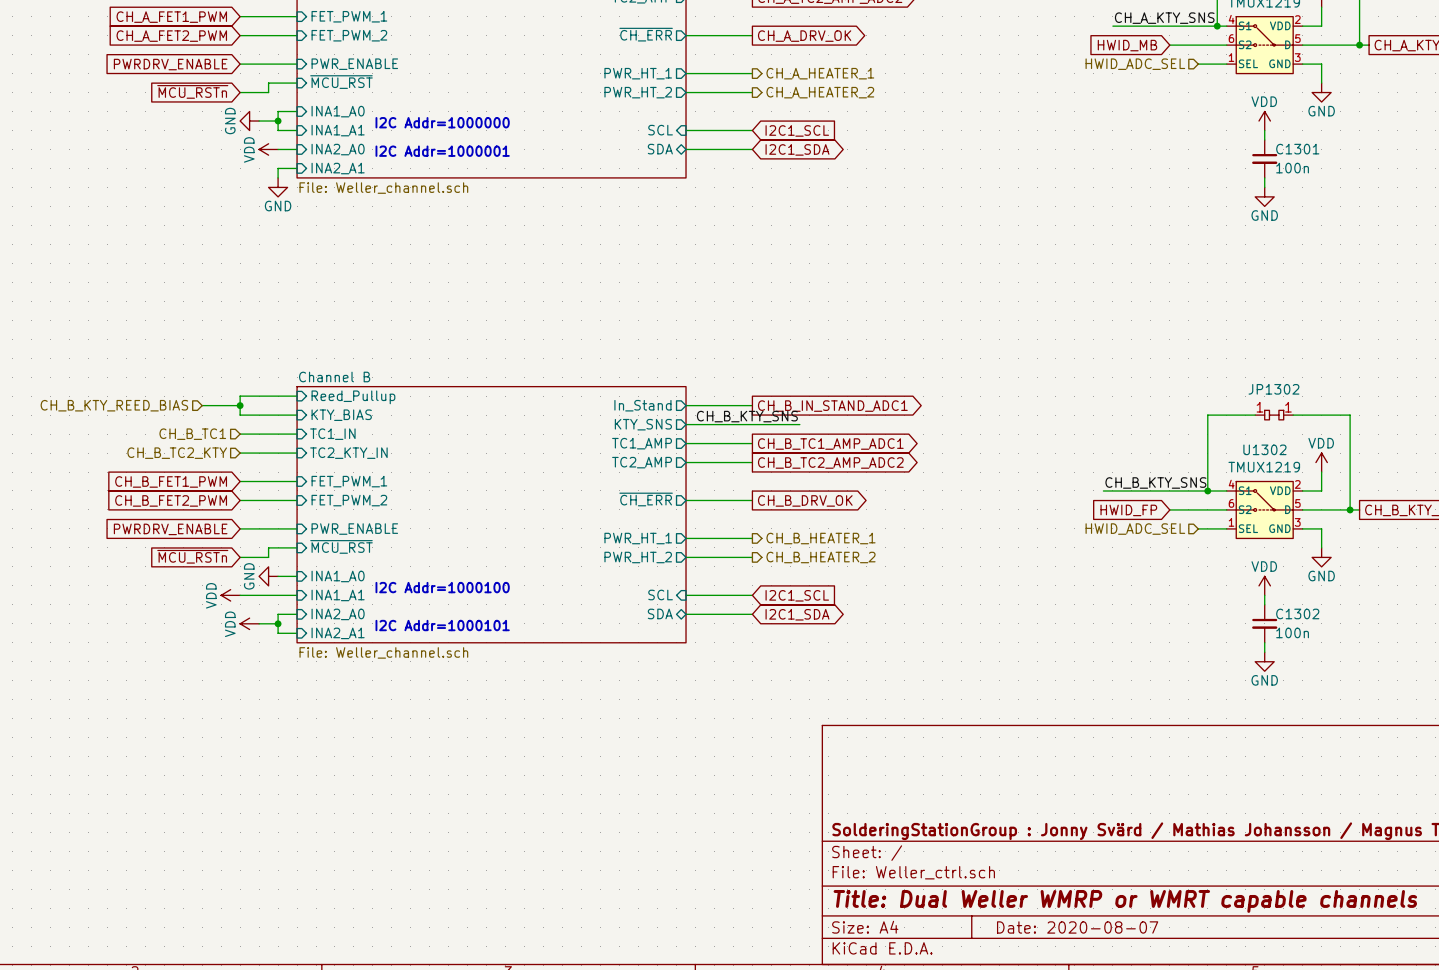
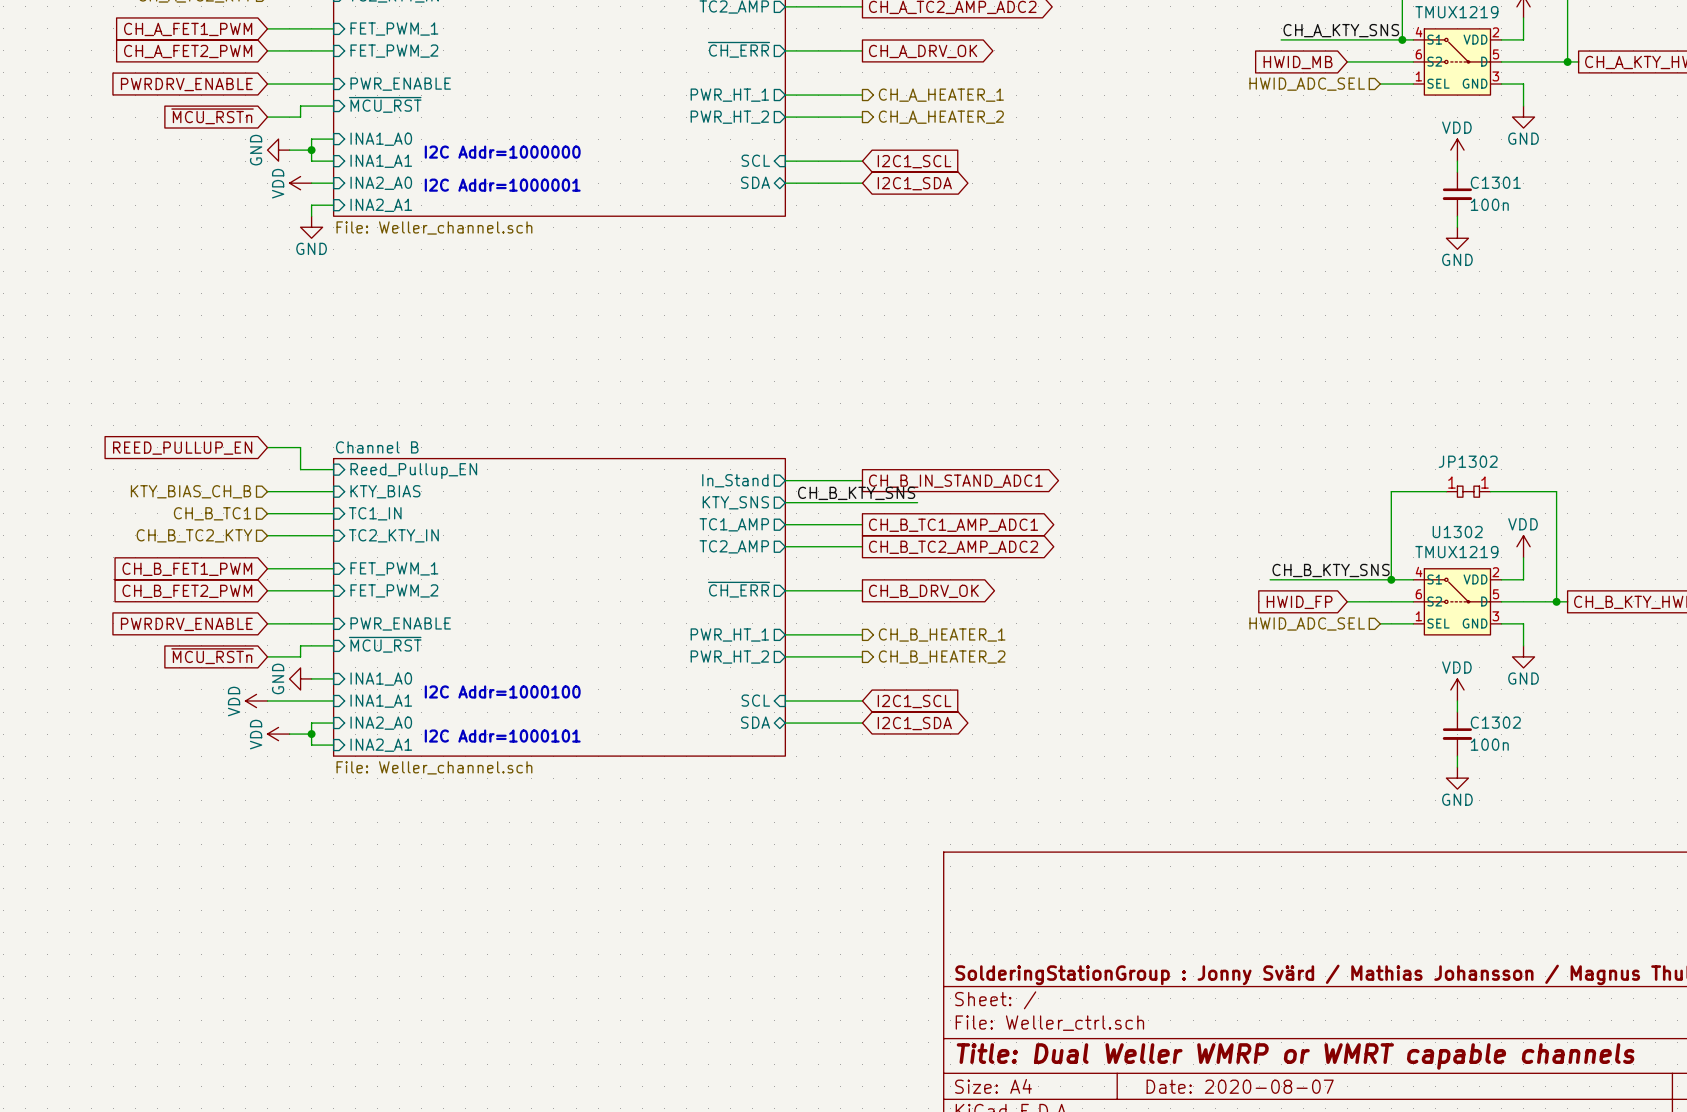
global label: none -> REED_PULLUP_EN (182, 448)
wire: (268, 396) (240, 396) (240, 415) -> (300, 469) (300, 447) (267, 447)
sheet pin: Reed_Pullup (353, 397) -> Reed_Pullup_EN (413, 471)
hierarchical label: CH_B_KTY_REED_BIAS (114, 405) -> none
wire: (202, 405) (240, 405) -> none
junction: (240, 405) -> none
hierarchical label: none -> KTY_BIAS_CH_B (191, 491)

